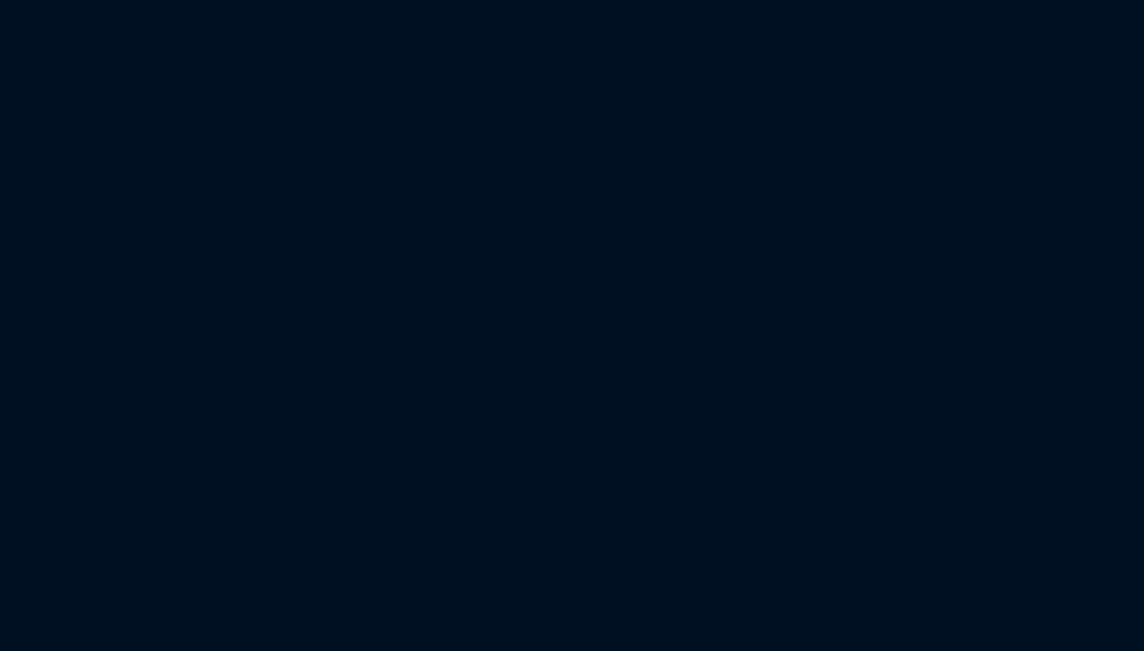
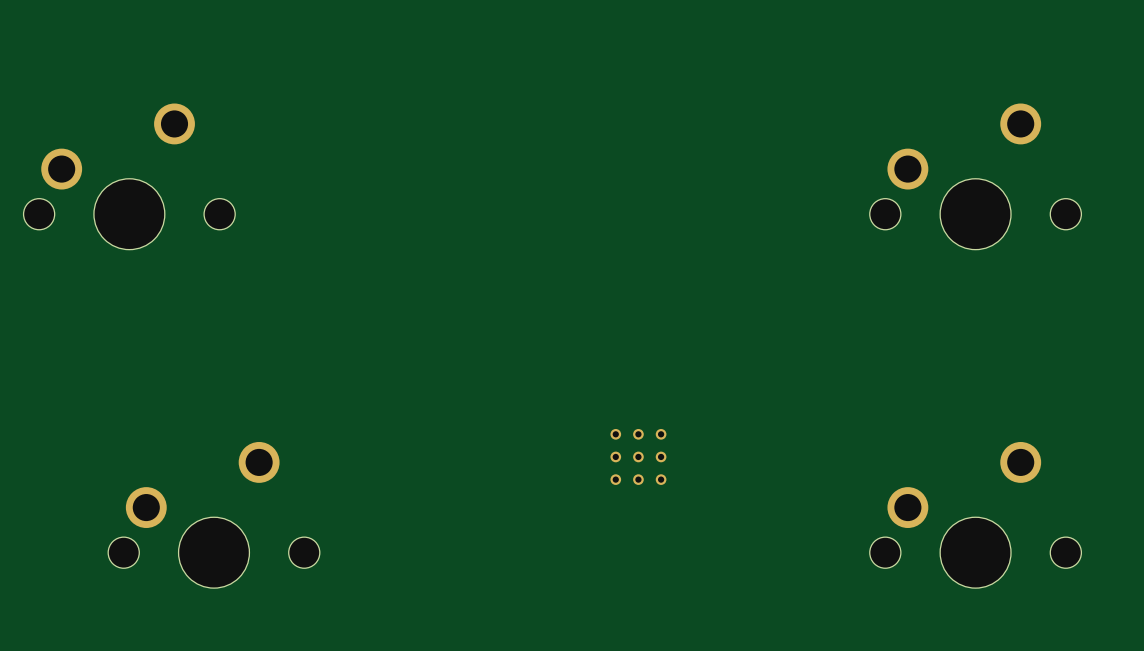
part: none -> (129, 176)
part: none -> (975, 176)
part: none -> (638, 456)
part: none -> (214, 515)
part: none -> (975, 515)

